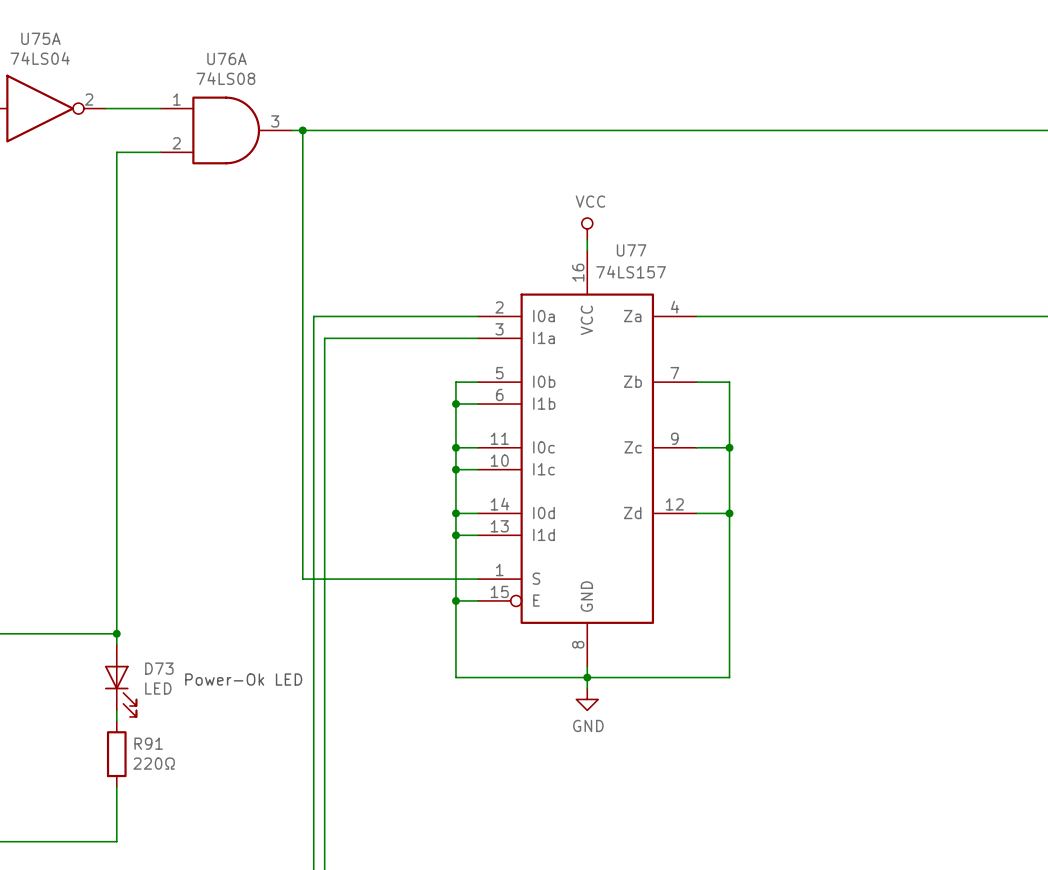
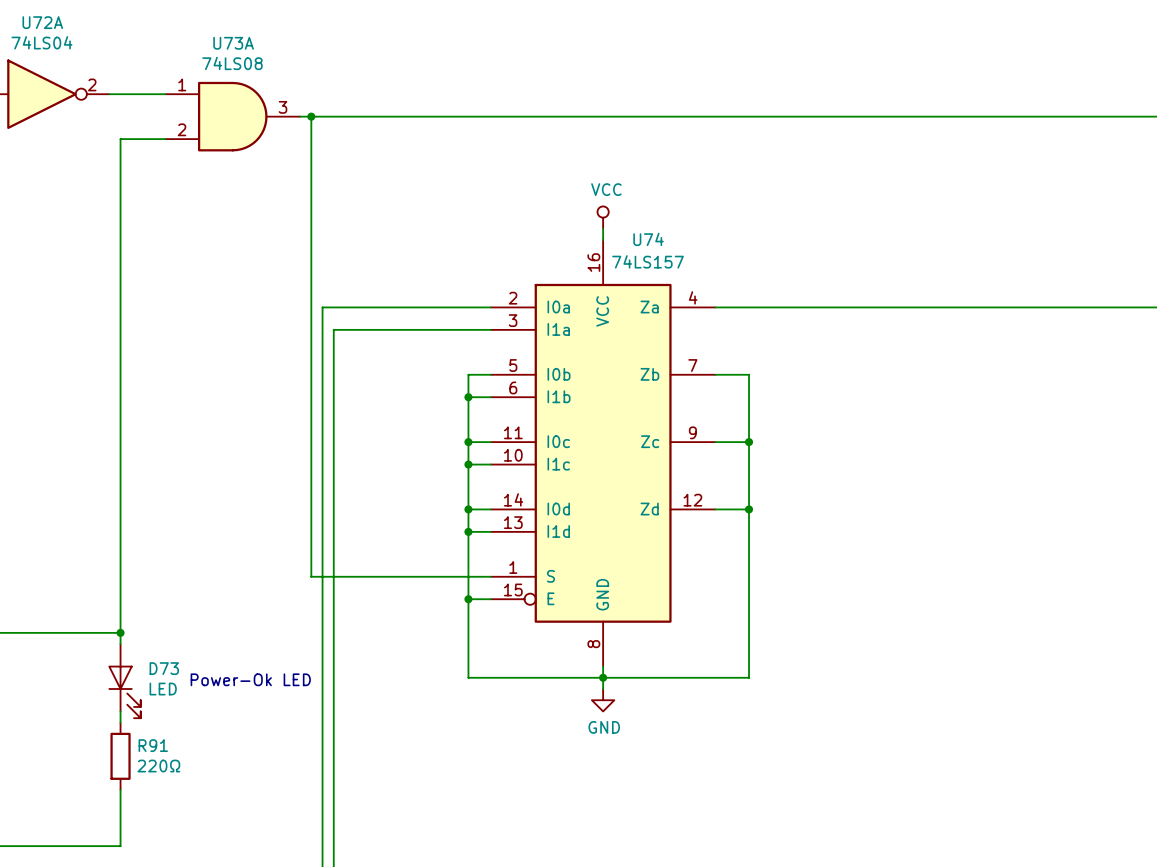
U75A name: U75A (40, 38) -> U72A (42, 22)
U76A name: U76A (226, 58) -> U73A (233, 43)
U77 name: U77 (631, 250) -> U74 (648, 239)

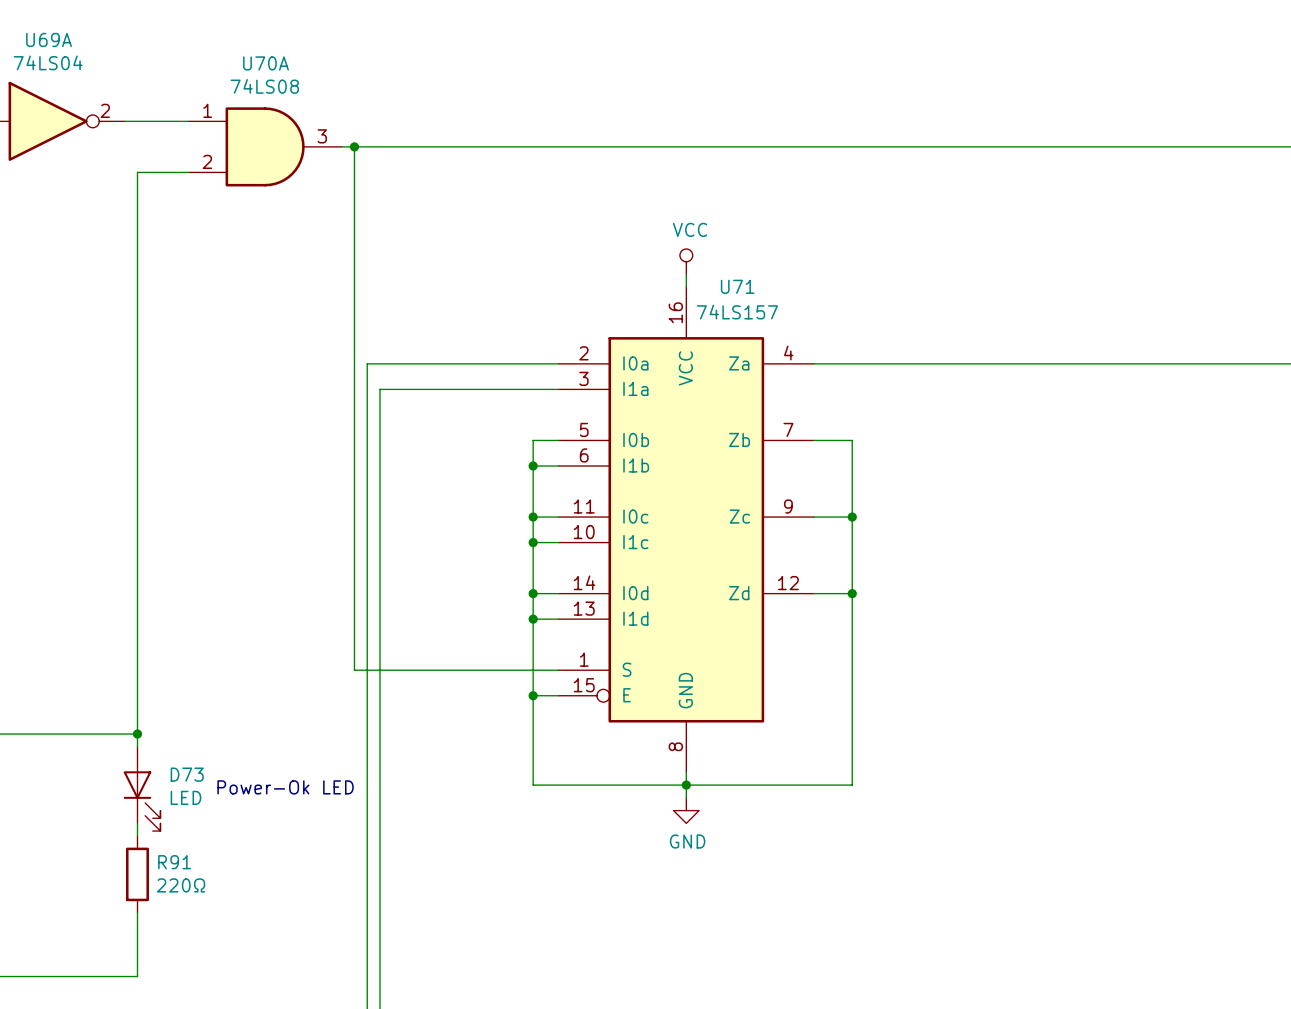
U72A name: U72A (42, 22) -> U69A (49, 39)
U73A name: U73A (233, 43) -> U70A (266, 63)
U74 name: U74 (648, 239) -> U71 (737, 286)

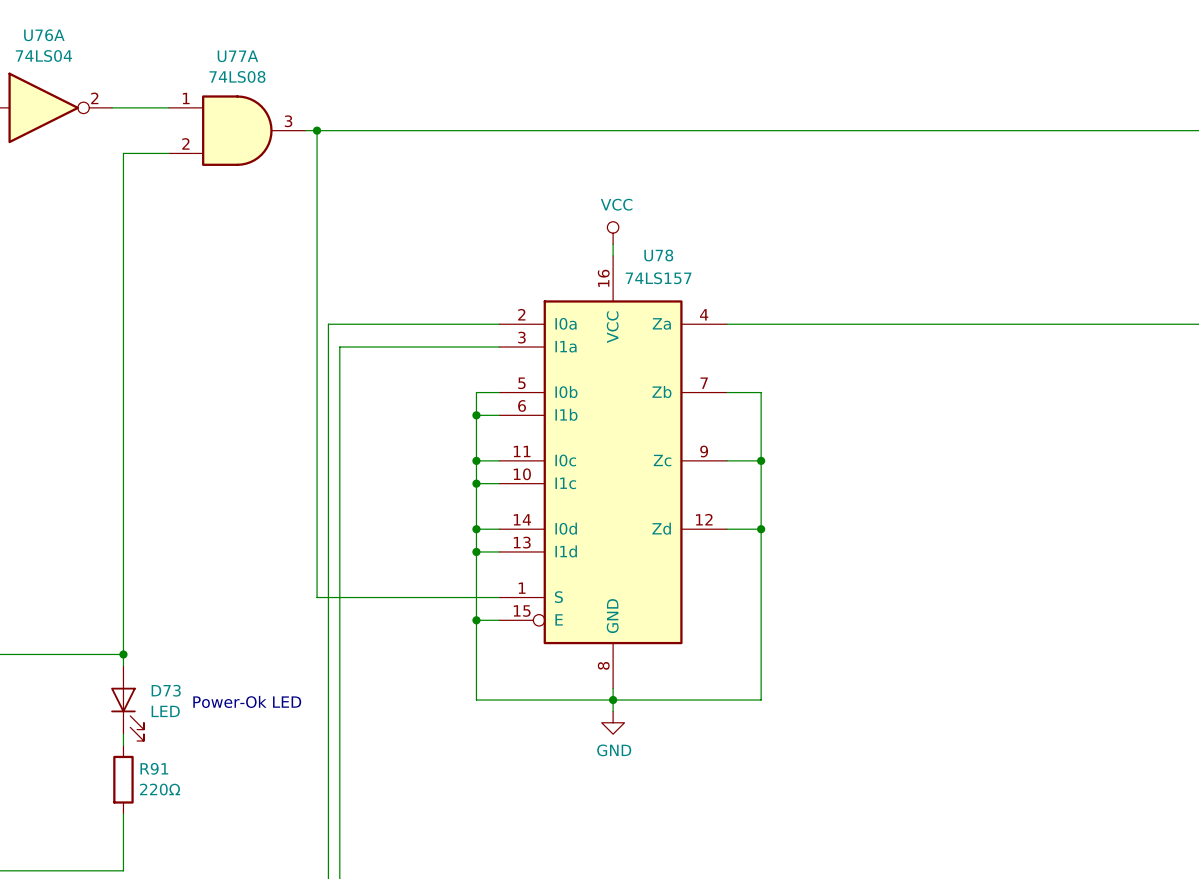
U69A name: U69A (49, 39) -> U76A (44, 35)
U70A name: U70A (266, 63) -> U77A (237, 56)
U71 name: U71 (737, 286) -> U78 (658, 255)

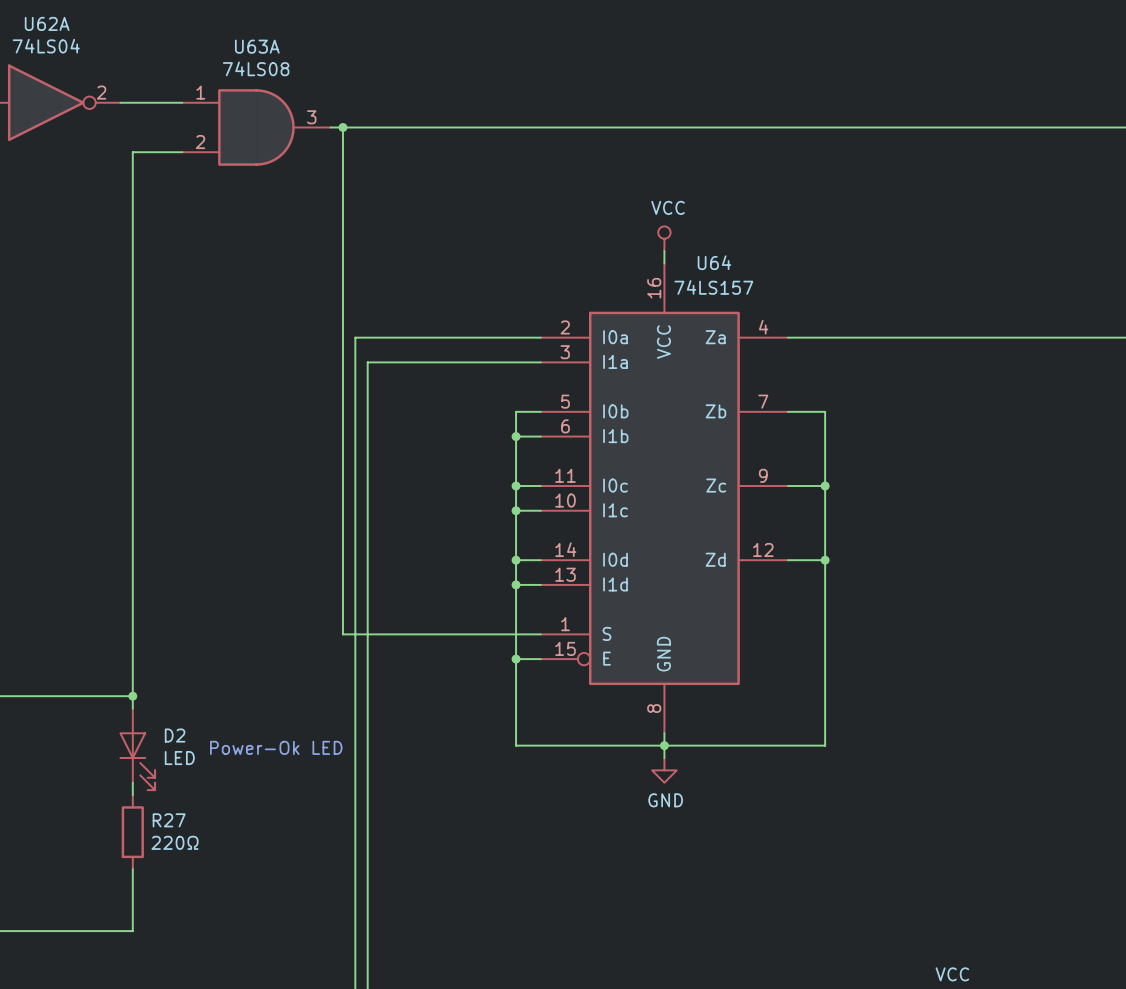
U76A name: U76A (44, 35) -> U62A (47, 23)
U77A name: U77A (237, 56) -> U63A (257, 46)
U78 name: U78 (658, 255) -> U64 (714, 262)
D73 name: D73 (166, 690) -> D2 (175, 735)
R91 name: R91 (154, 768) -> R27 (169, 820)

